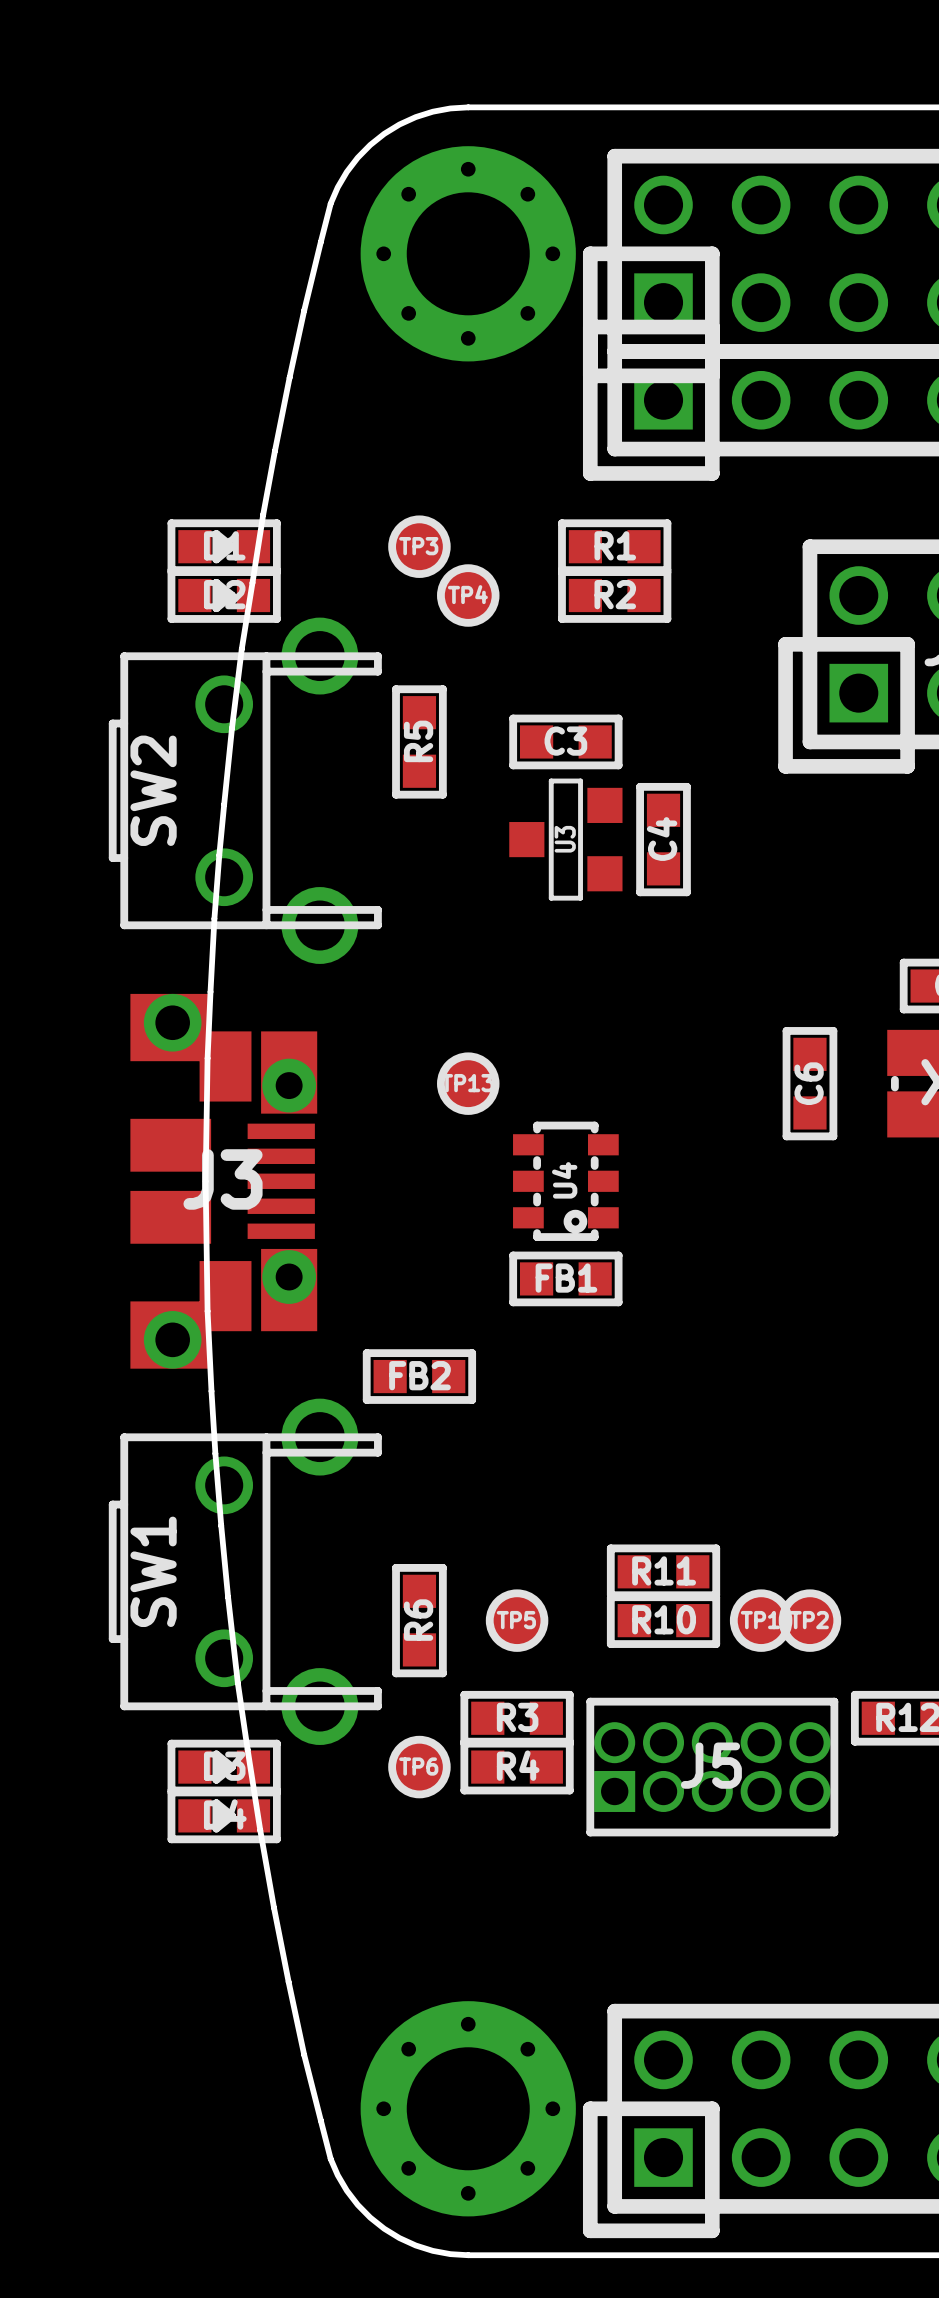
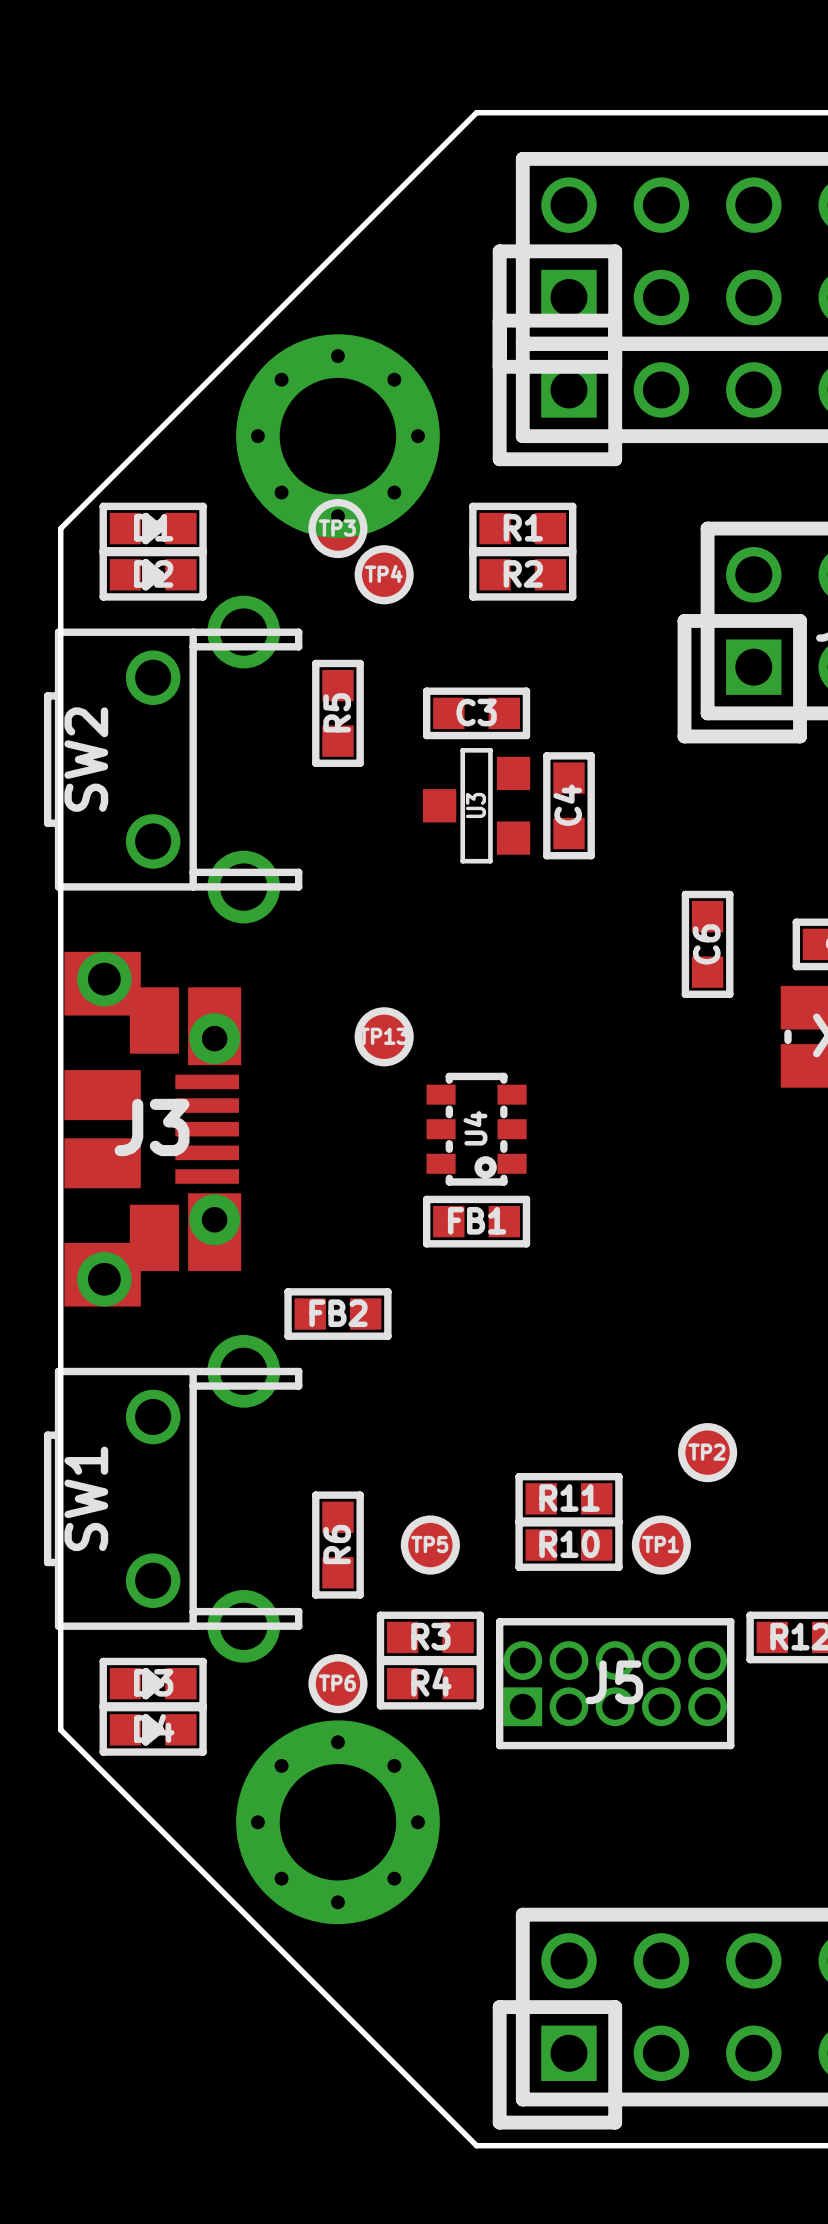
board edge: (565, 107) (450, 108) (415, 117) (384, 133) (370, 144) (346, 171) (330, 203) (304, 310) (274, 451) (241, 649) (224, 804) (214, 918) (207, 1058) (205, 1181) (207, 1311) (215, 1453) (237, 1683) (273, 1907) (304, 2055) (330, 2158) (337, 2175) (357, 2204) (384, 2228) (415, 2245) (450, 2254) (565, 2255) -> (476, 112) (60, 528) (60, 1729) (476, 2145)
part position: (468, 253) -> (337, 436)
C6 position: (809, 1083) -> (707, 944)
TP2 position: (809, 1620) -> (707, 1452)
part position: (468, 2108) -> (337, 1822)

